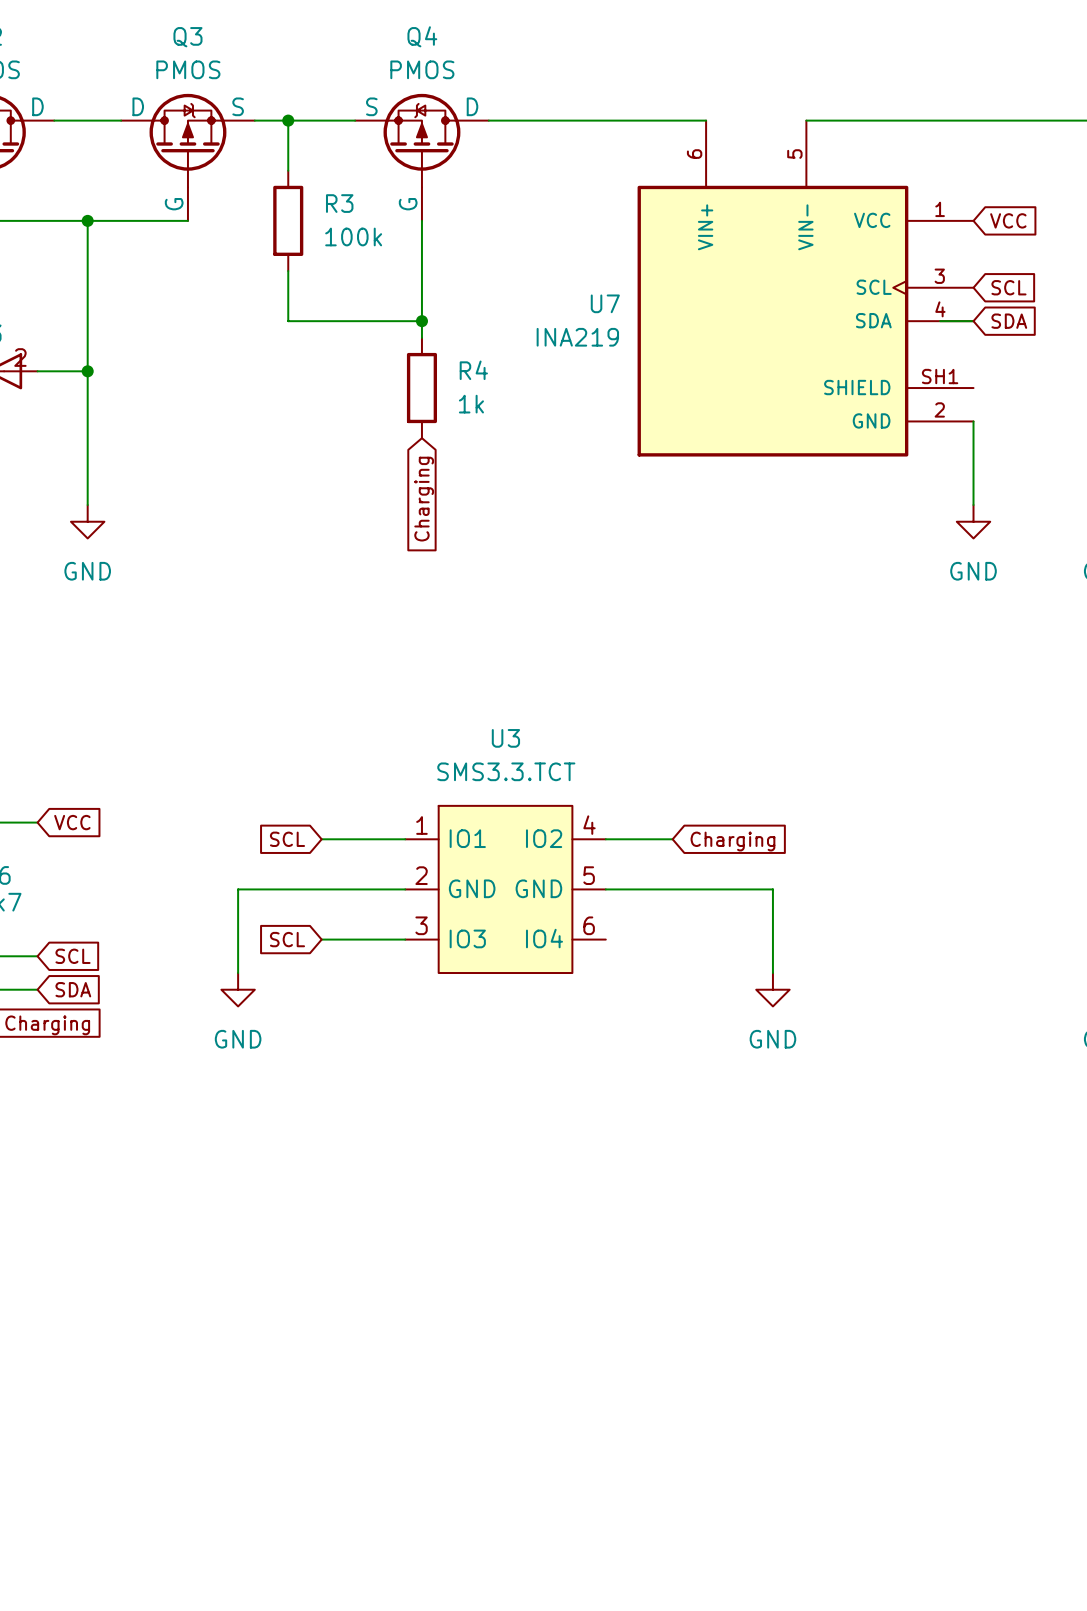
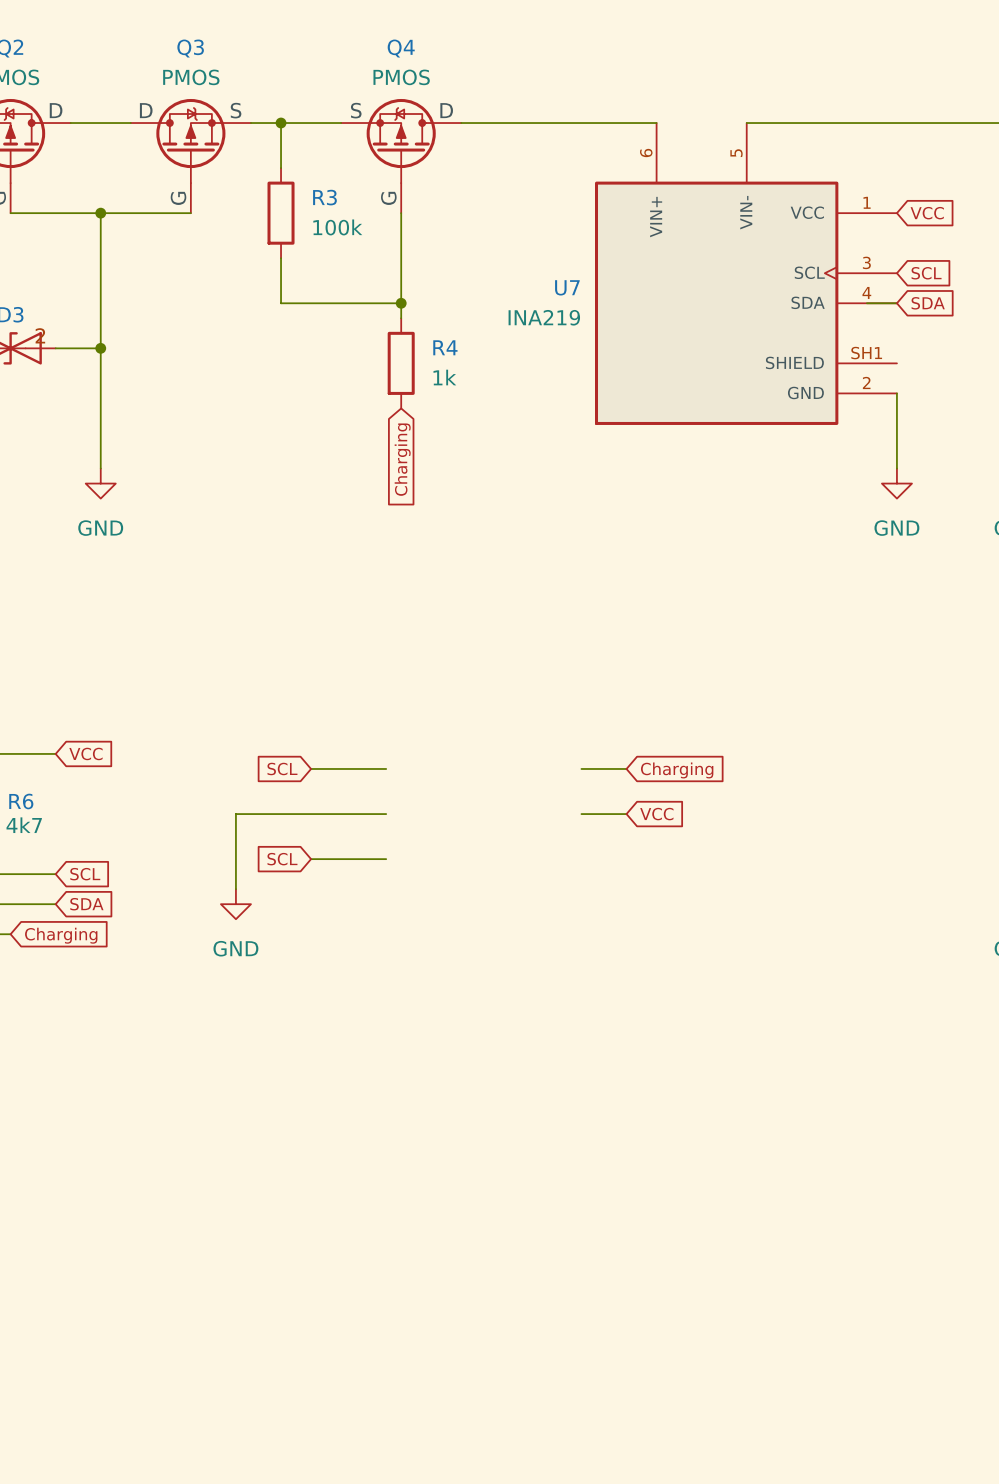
wire: (605, 839) (622, 839) -> none
U3: SMS3.3.TCT (505, 889) -> none
wire: (605, 889) (622, 889) -> none
wire: (672, 889) (772, 889) (772, 973) -> none
global label: none -> VCC (656, 814)
power symbol: GND (772, 989) -> none

